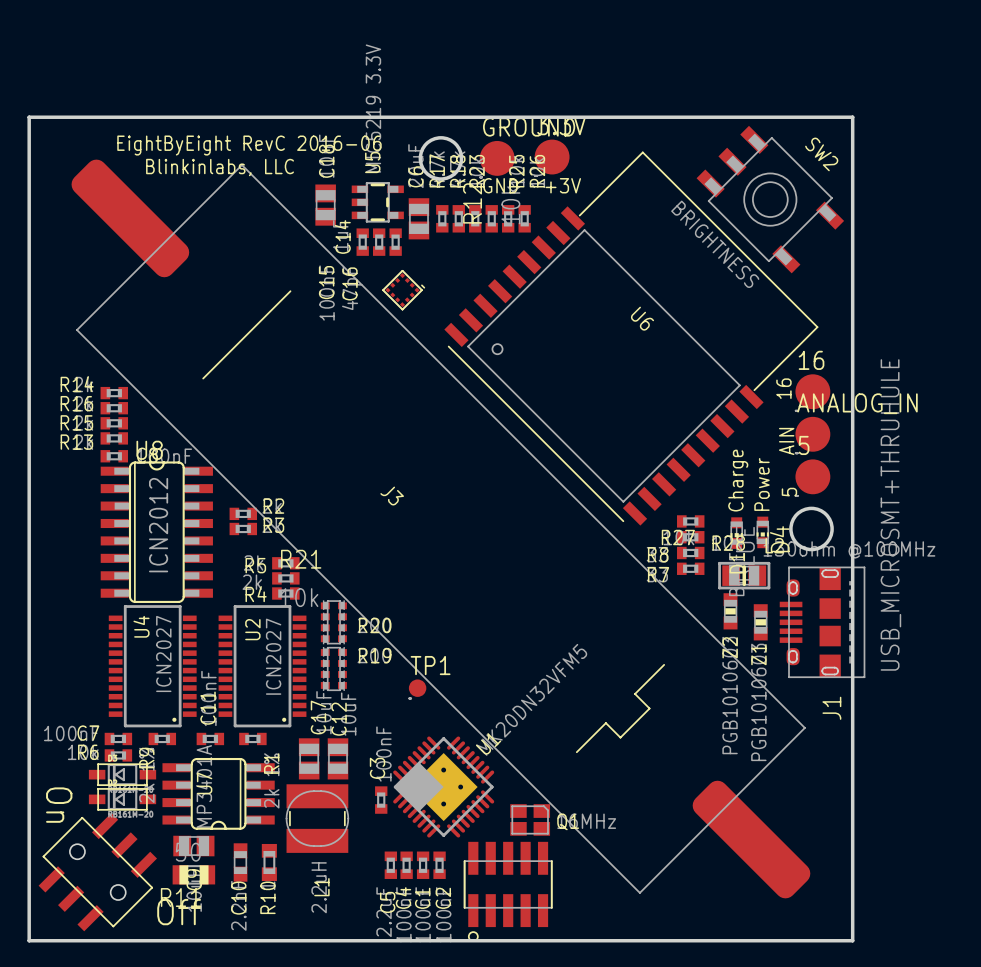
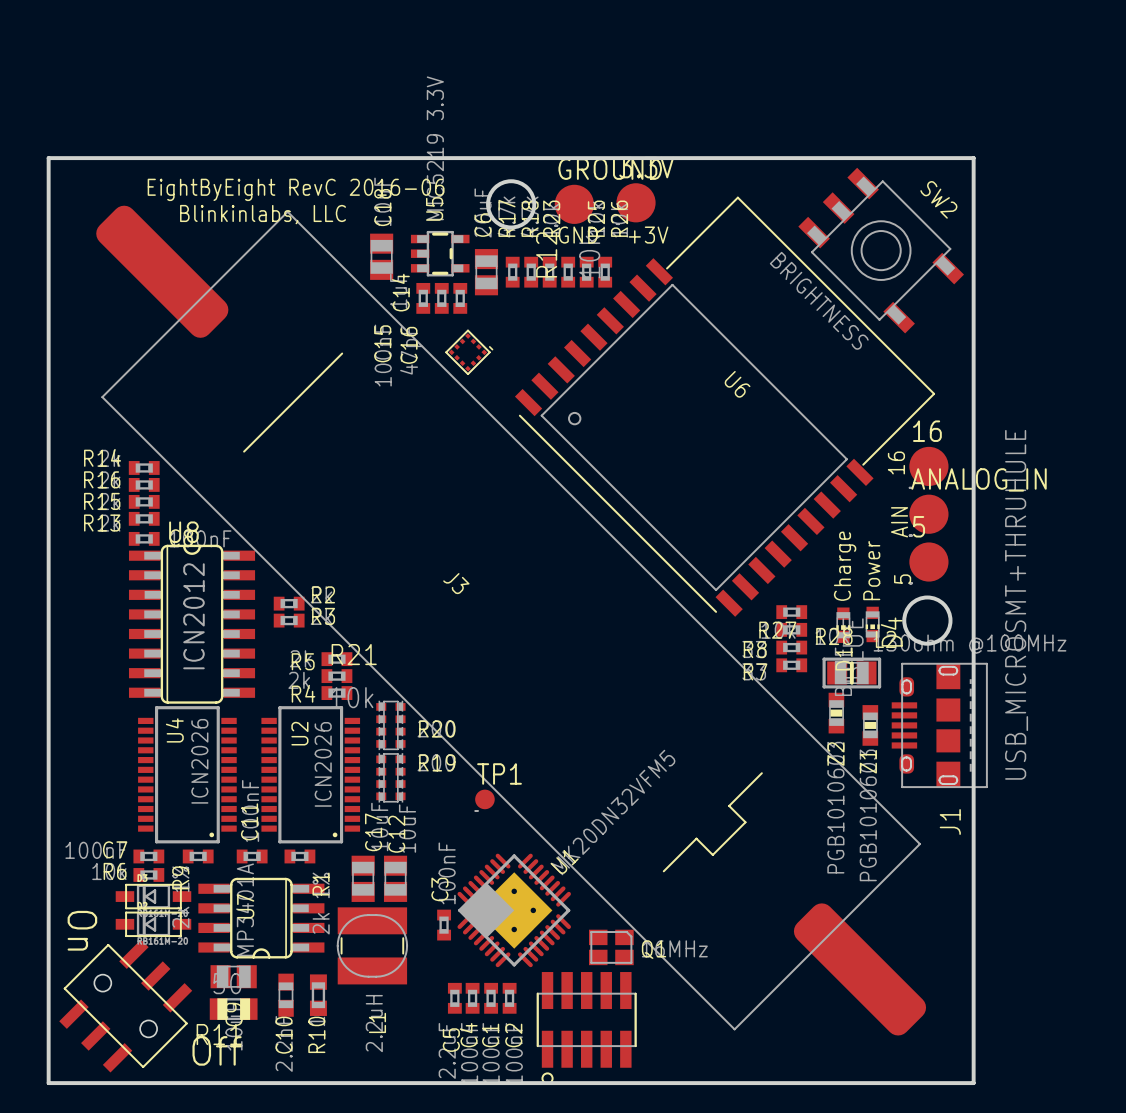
U4 value: ICN2027 (163, 653) -> ICN2026 (199, 761)
U2 value: ICN2027 (273, 656) -> ICN2026 (323, 764)

